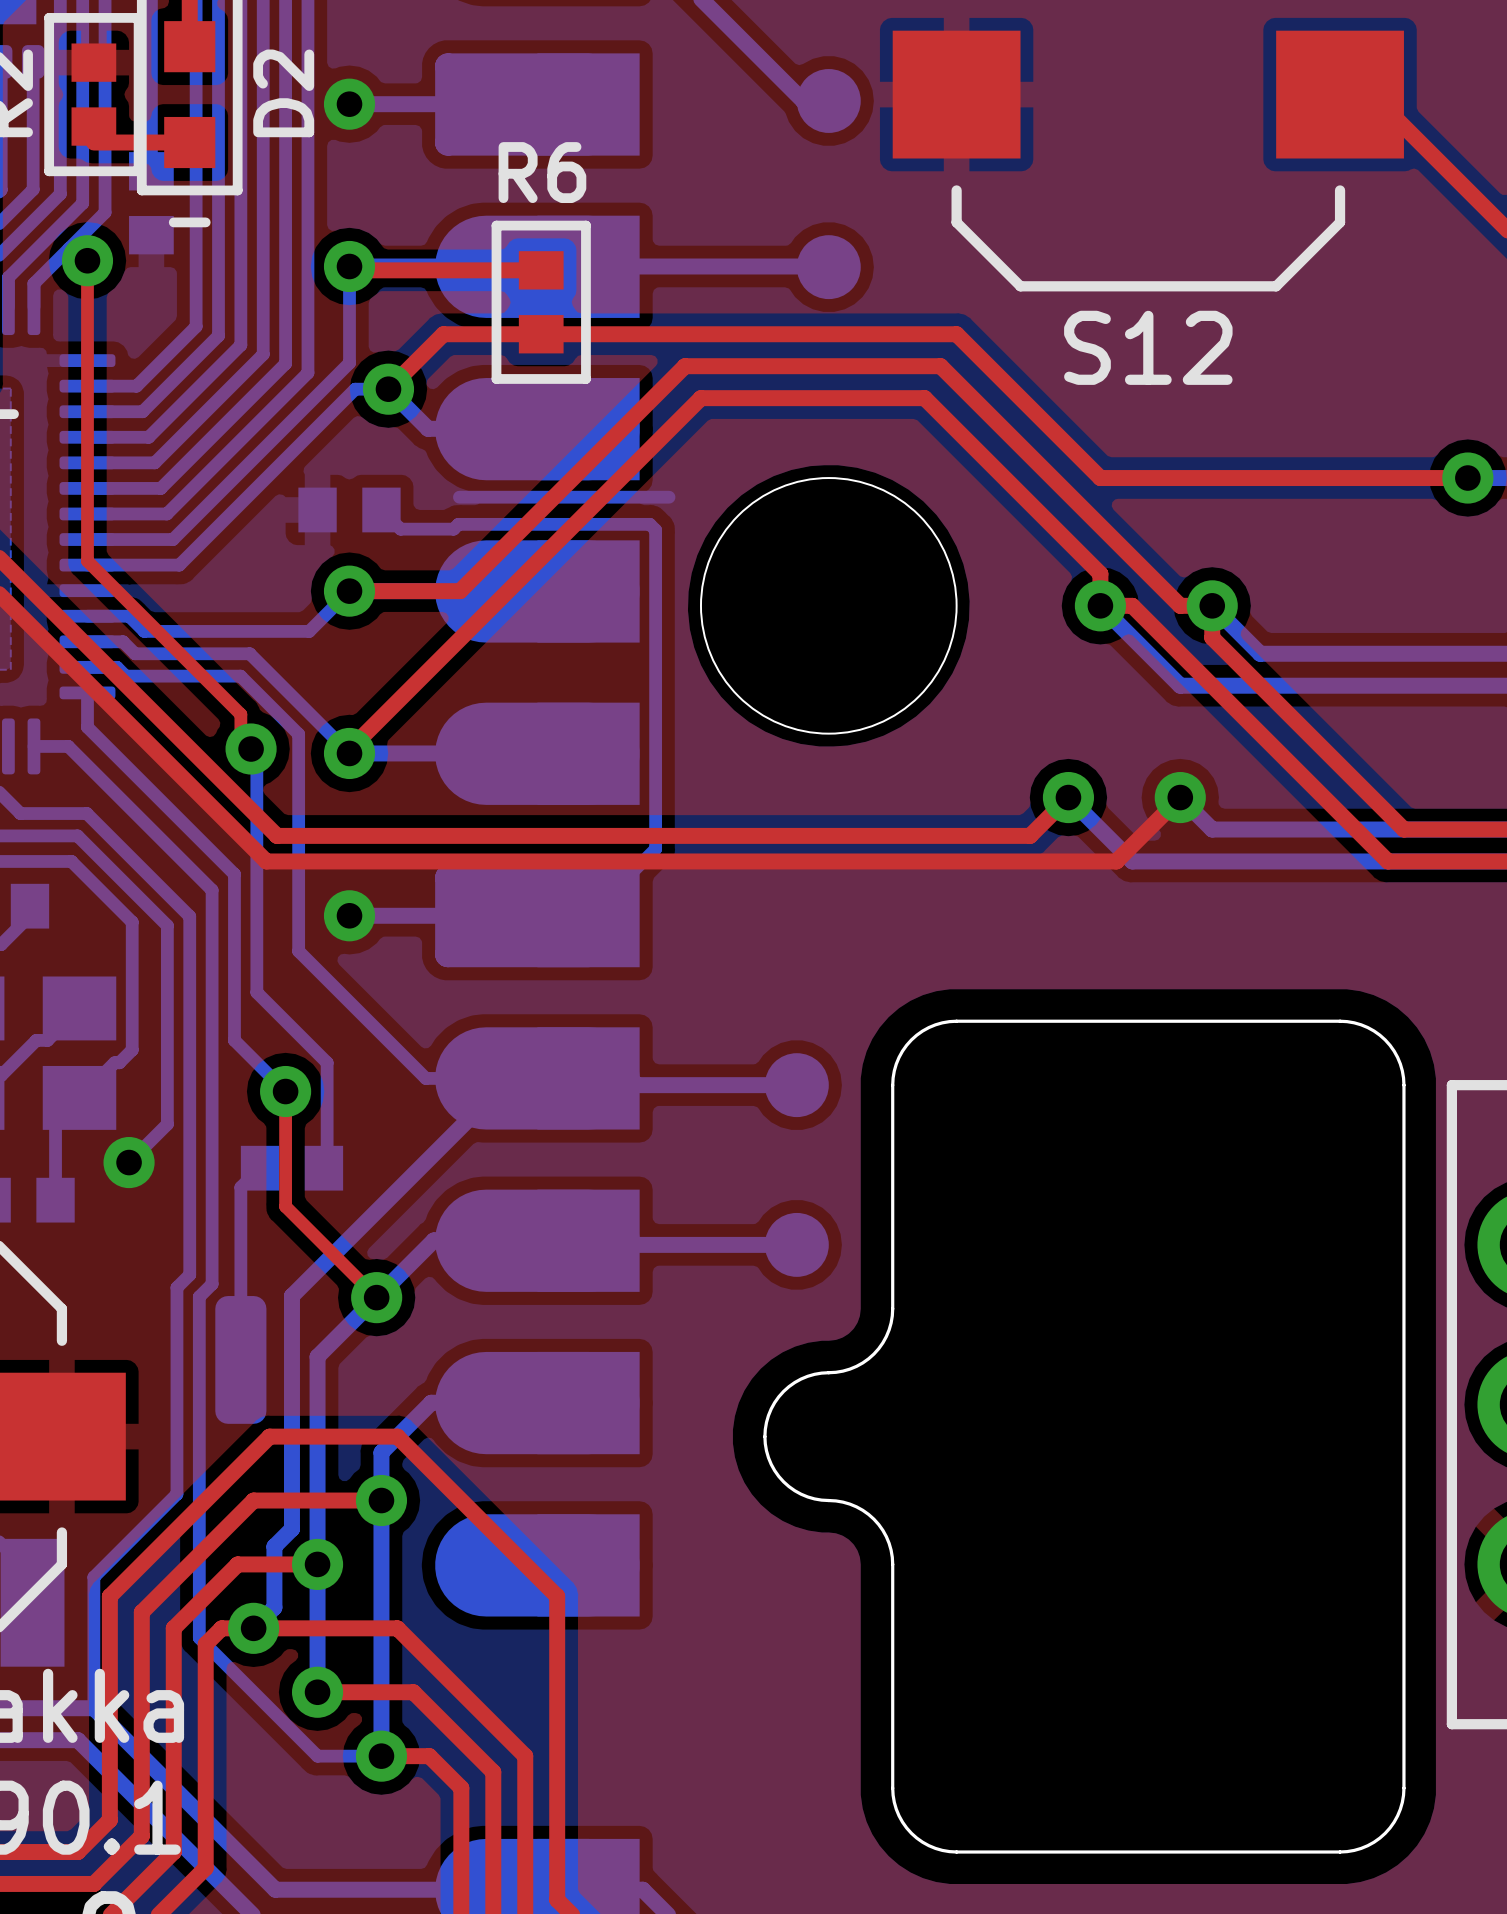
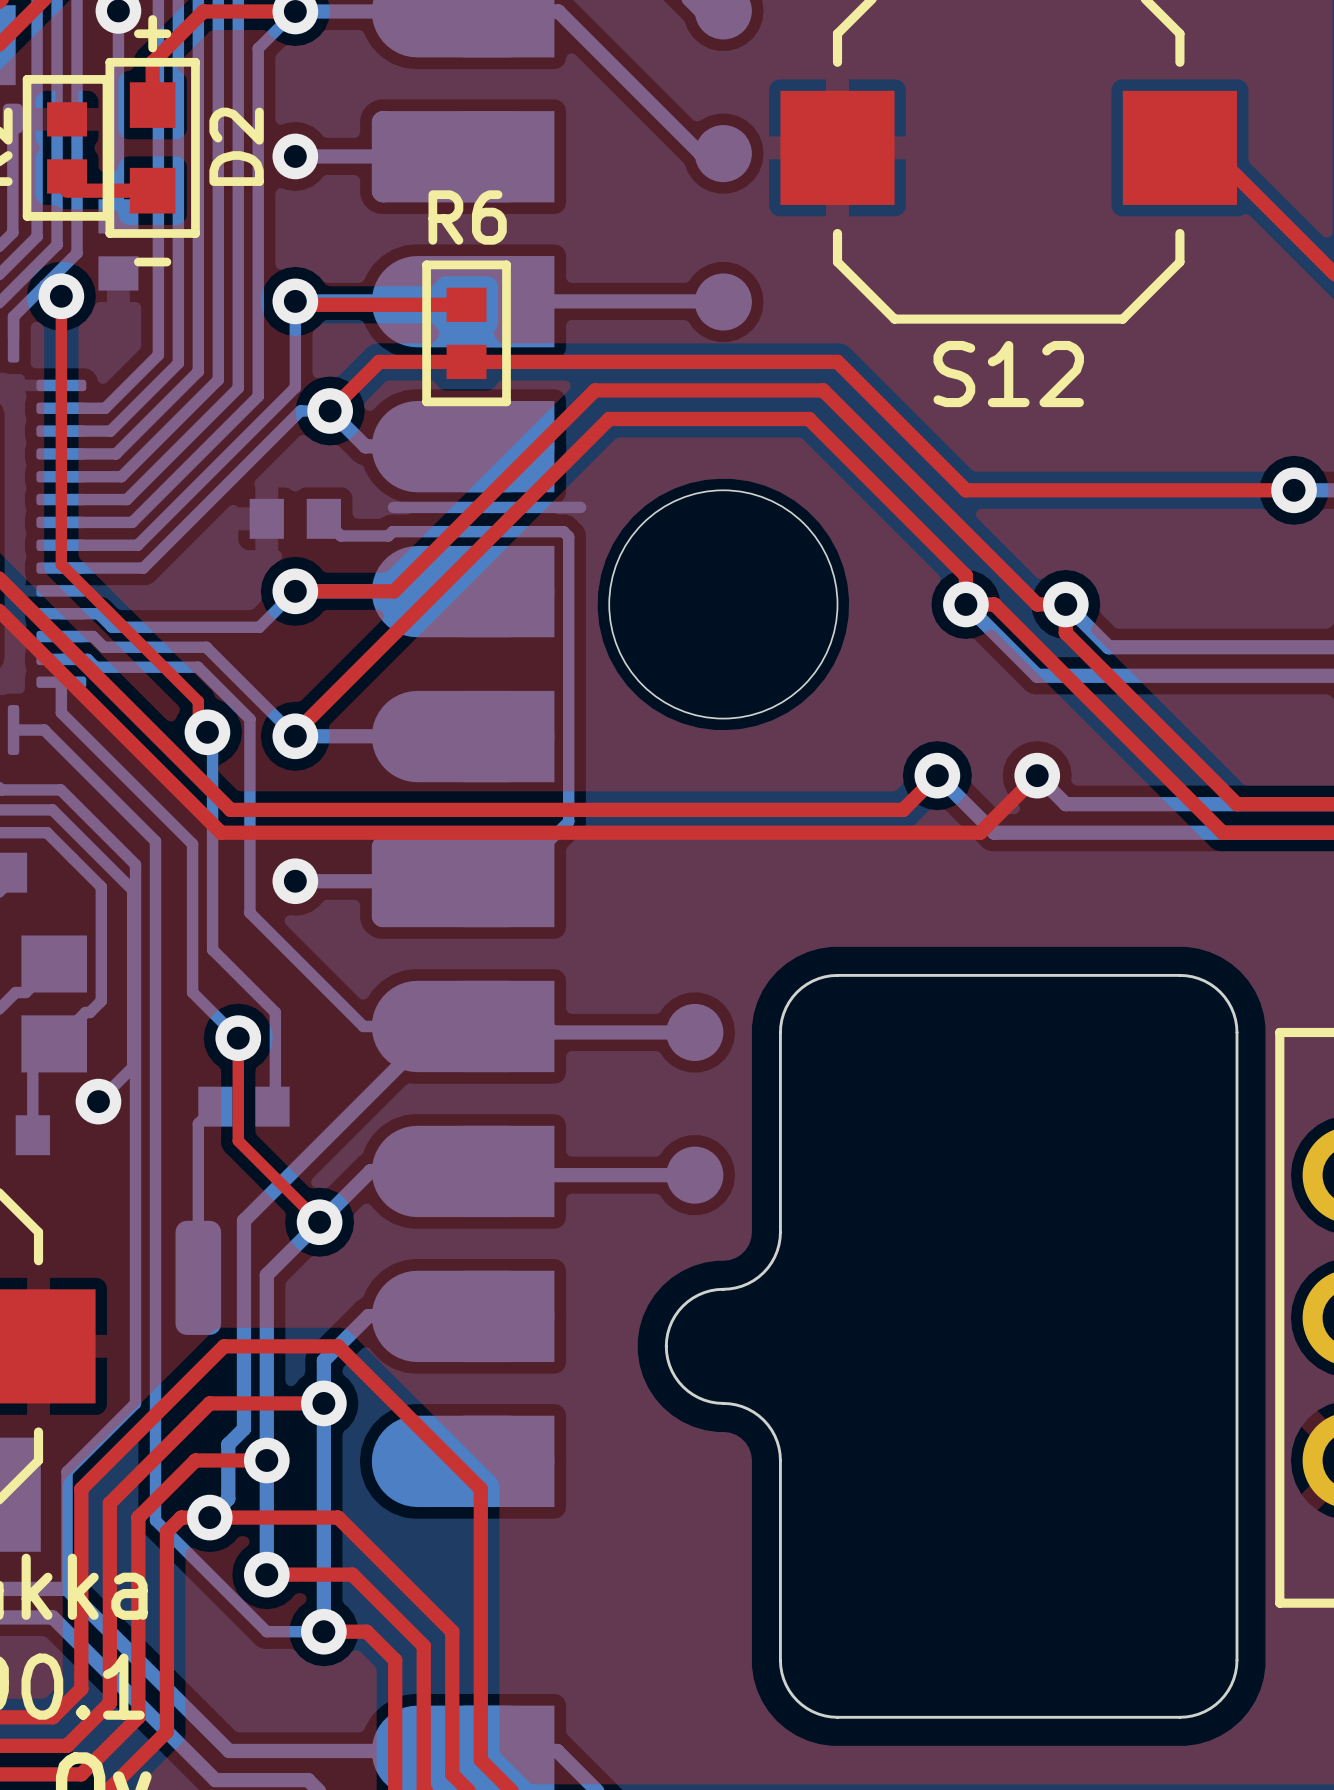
bottom track: (192, 871) (212, 890) (212, 1284) (199, 1296) (199, 1637) -> (155, 841) (155, 1520) (161, 1526)
bottom track: (170, 897) (189, 916) (189, 1274) (176, 1287) (176, 1494) (170, 1500) -> (135, 864) (135, 1403)

